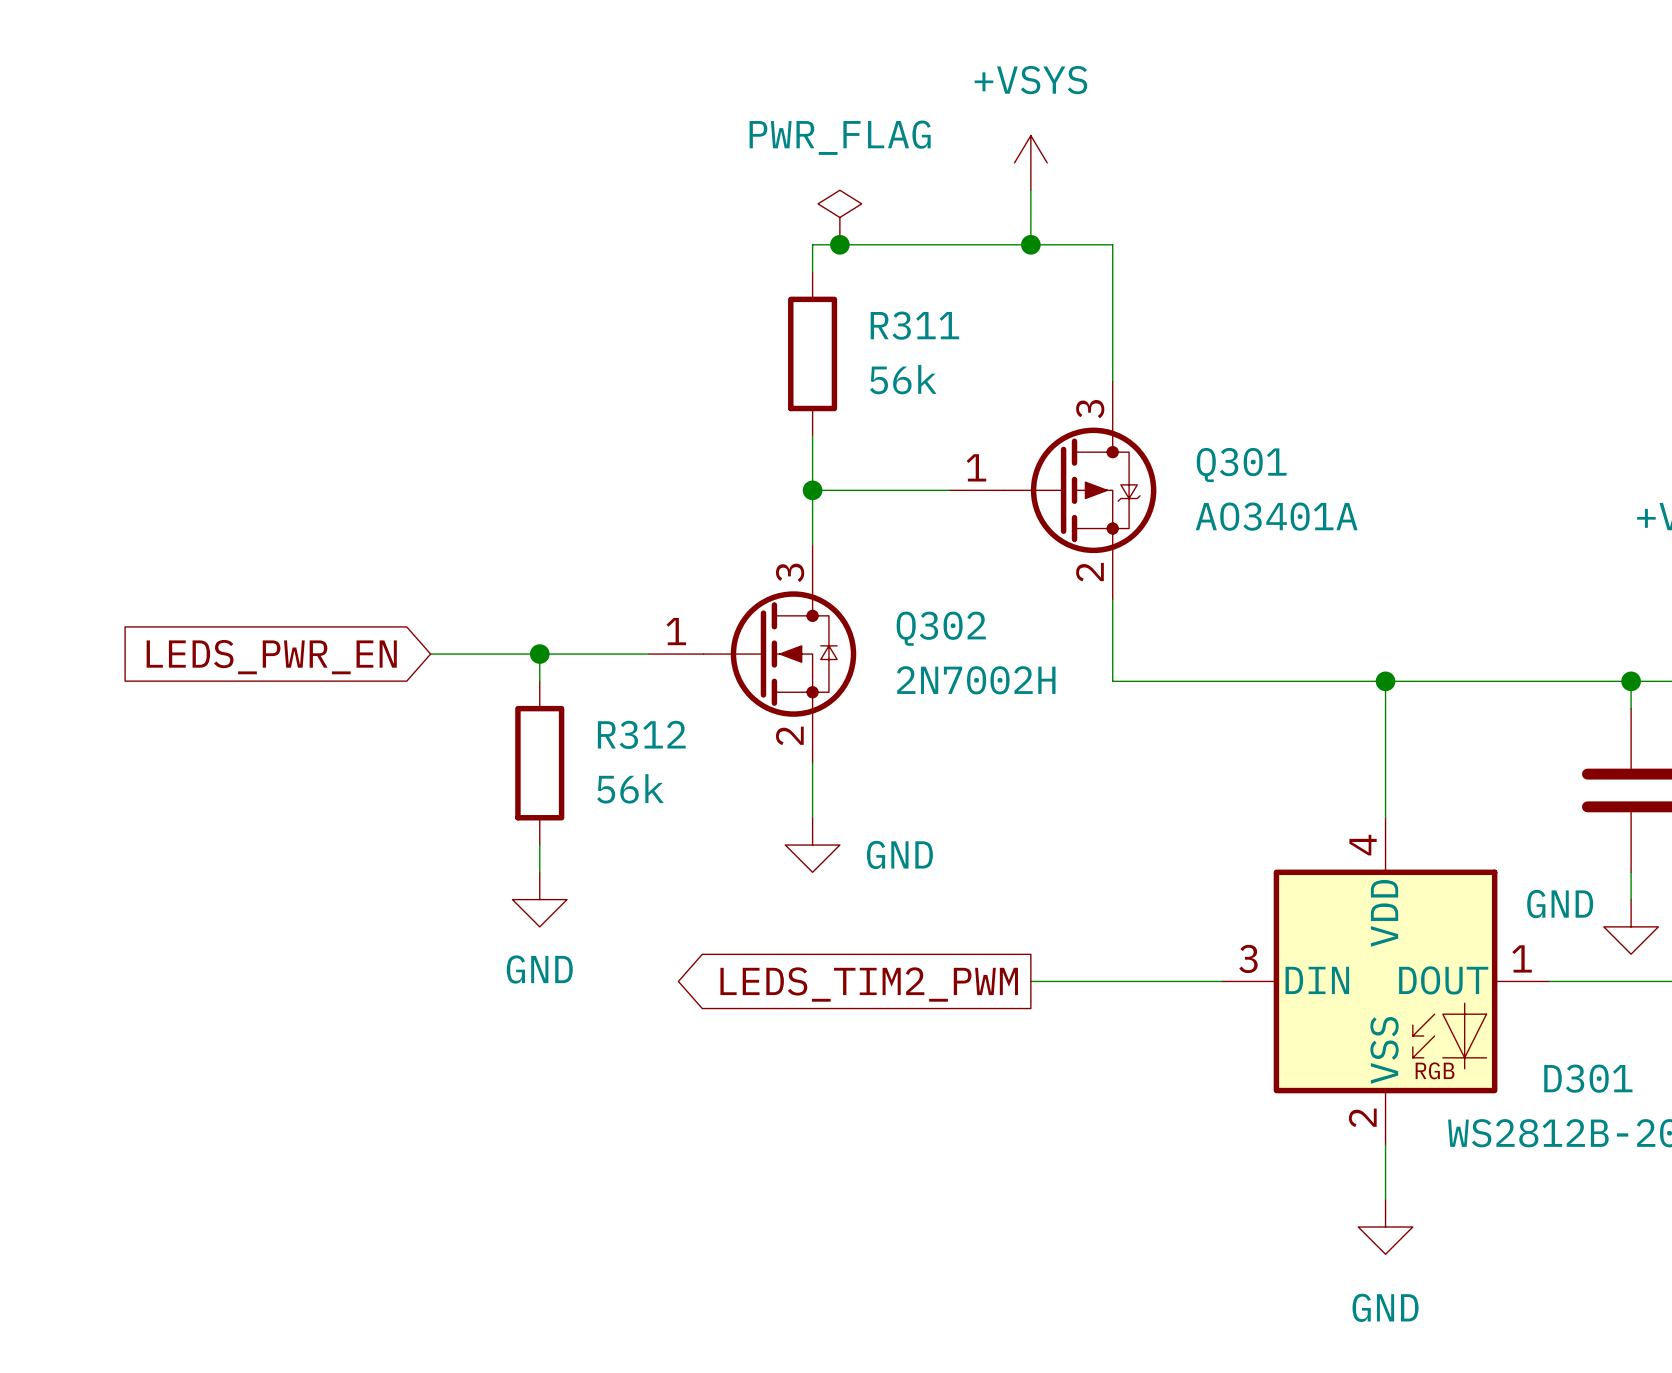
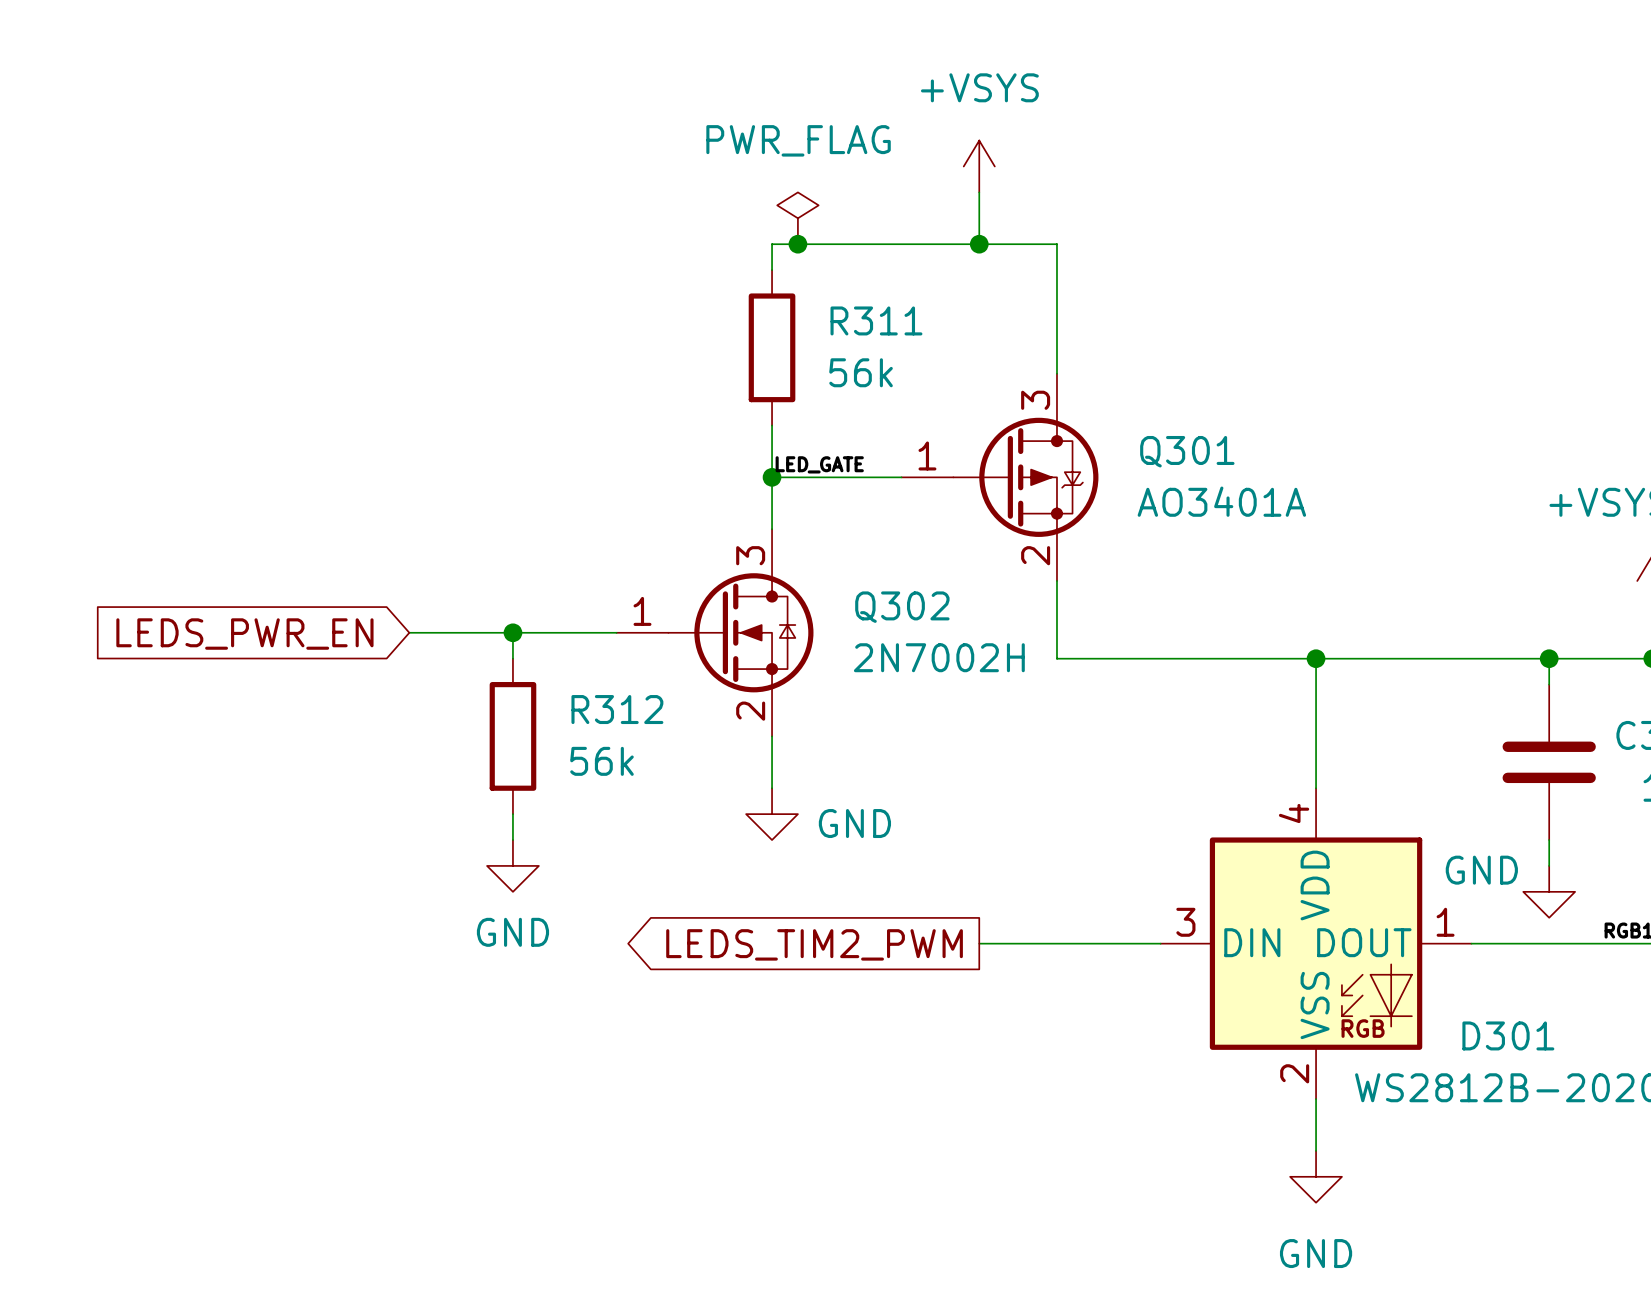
label: none -> LED_GATE (819, 464)

